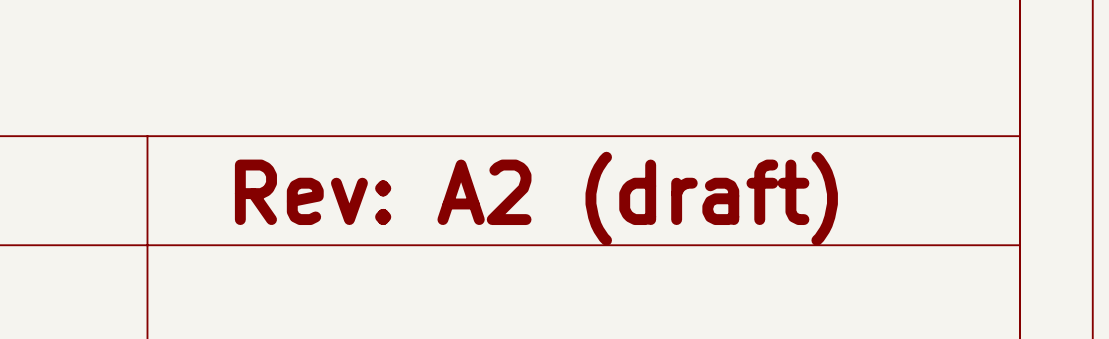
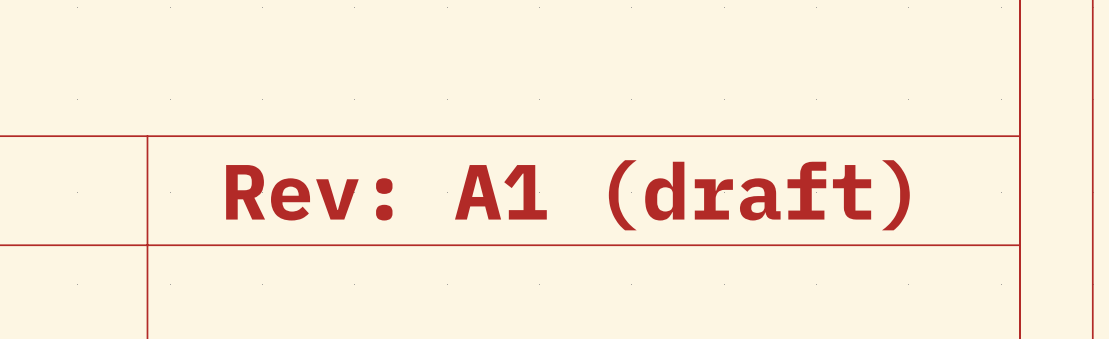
title block: Rev: A2 (draft) (536, 198) -> Rev: A1 (draft) (567, 195)

